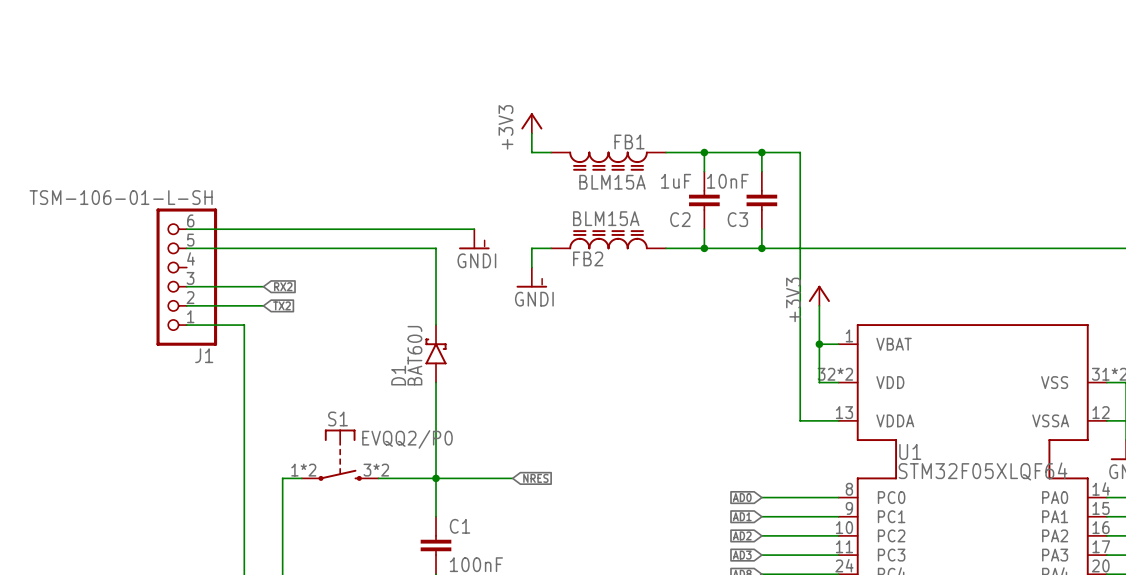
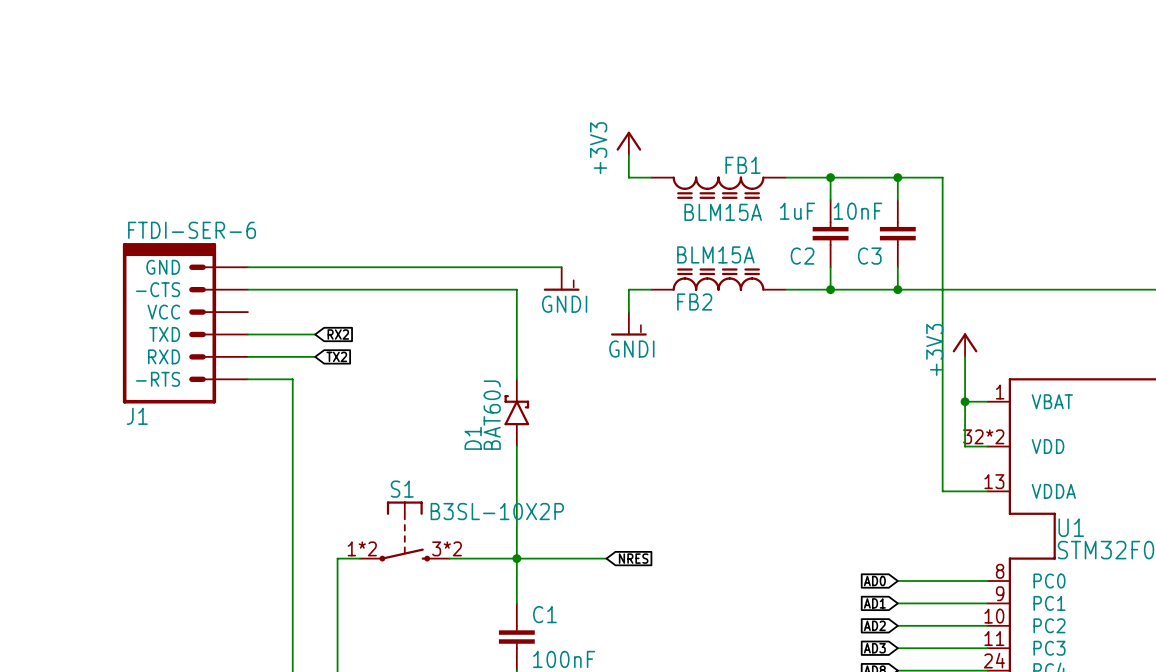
J1 value: TSM-106-01-L-SH (121, 197) -> FTDI-SER-6 (192, 230)
J1 symbol: [156, 208, 218, 346] -> [122, 243, 248, 404]
J1 name position: J1 (204, 355) -> J1 (137, 416)
S1 value: EVQQ2/P0 (407, 439) -> B3SL-10X2P (497, 511)

